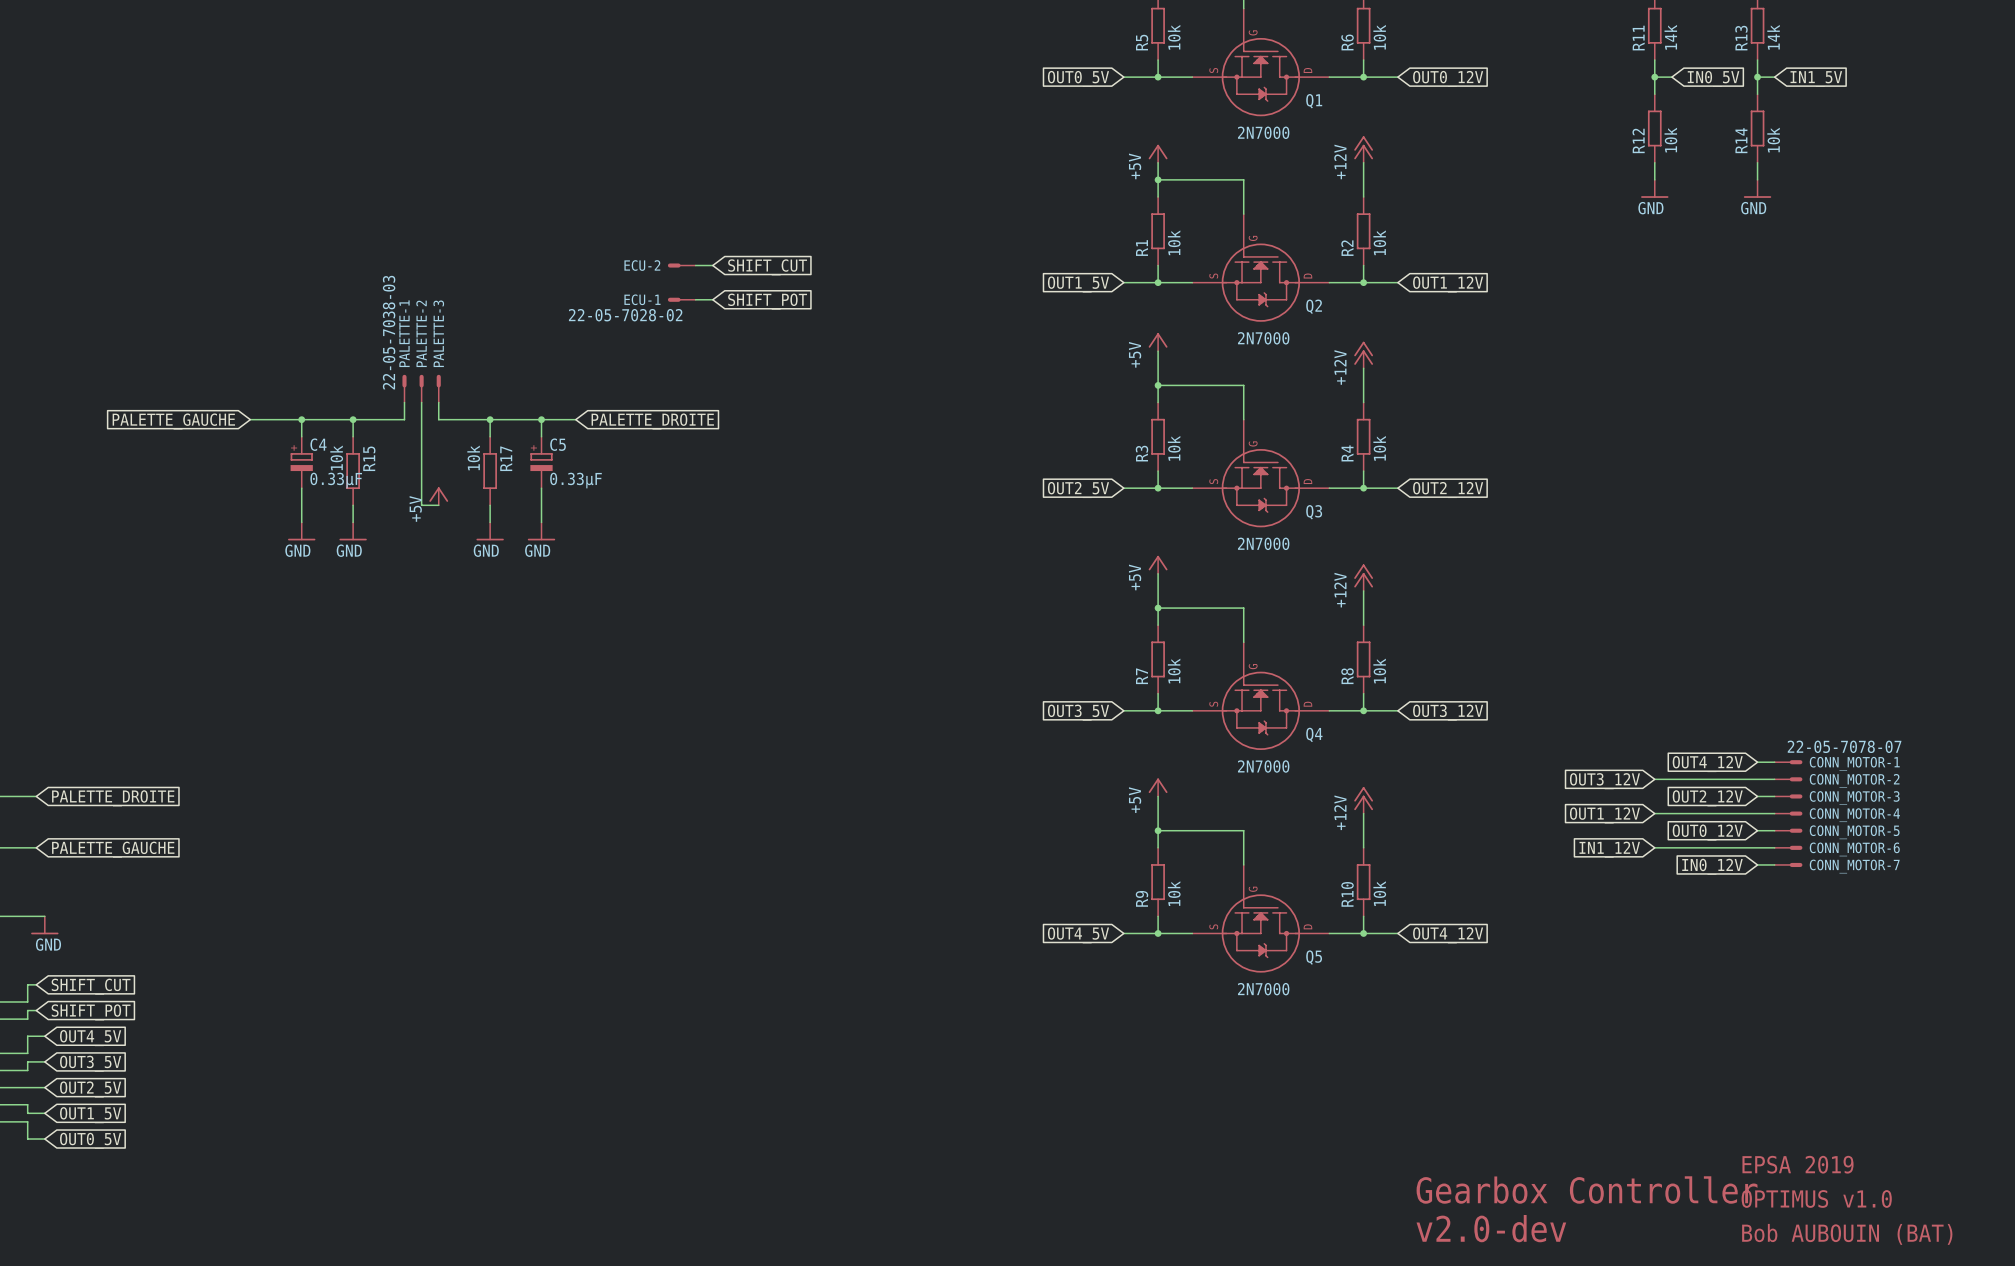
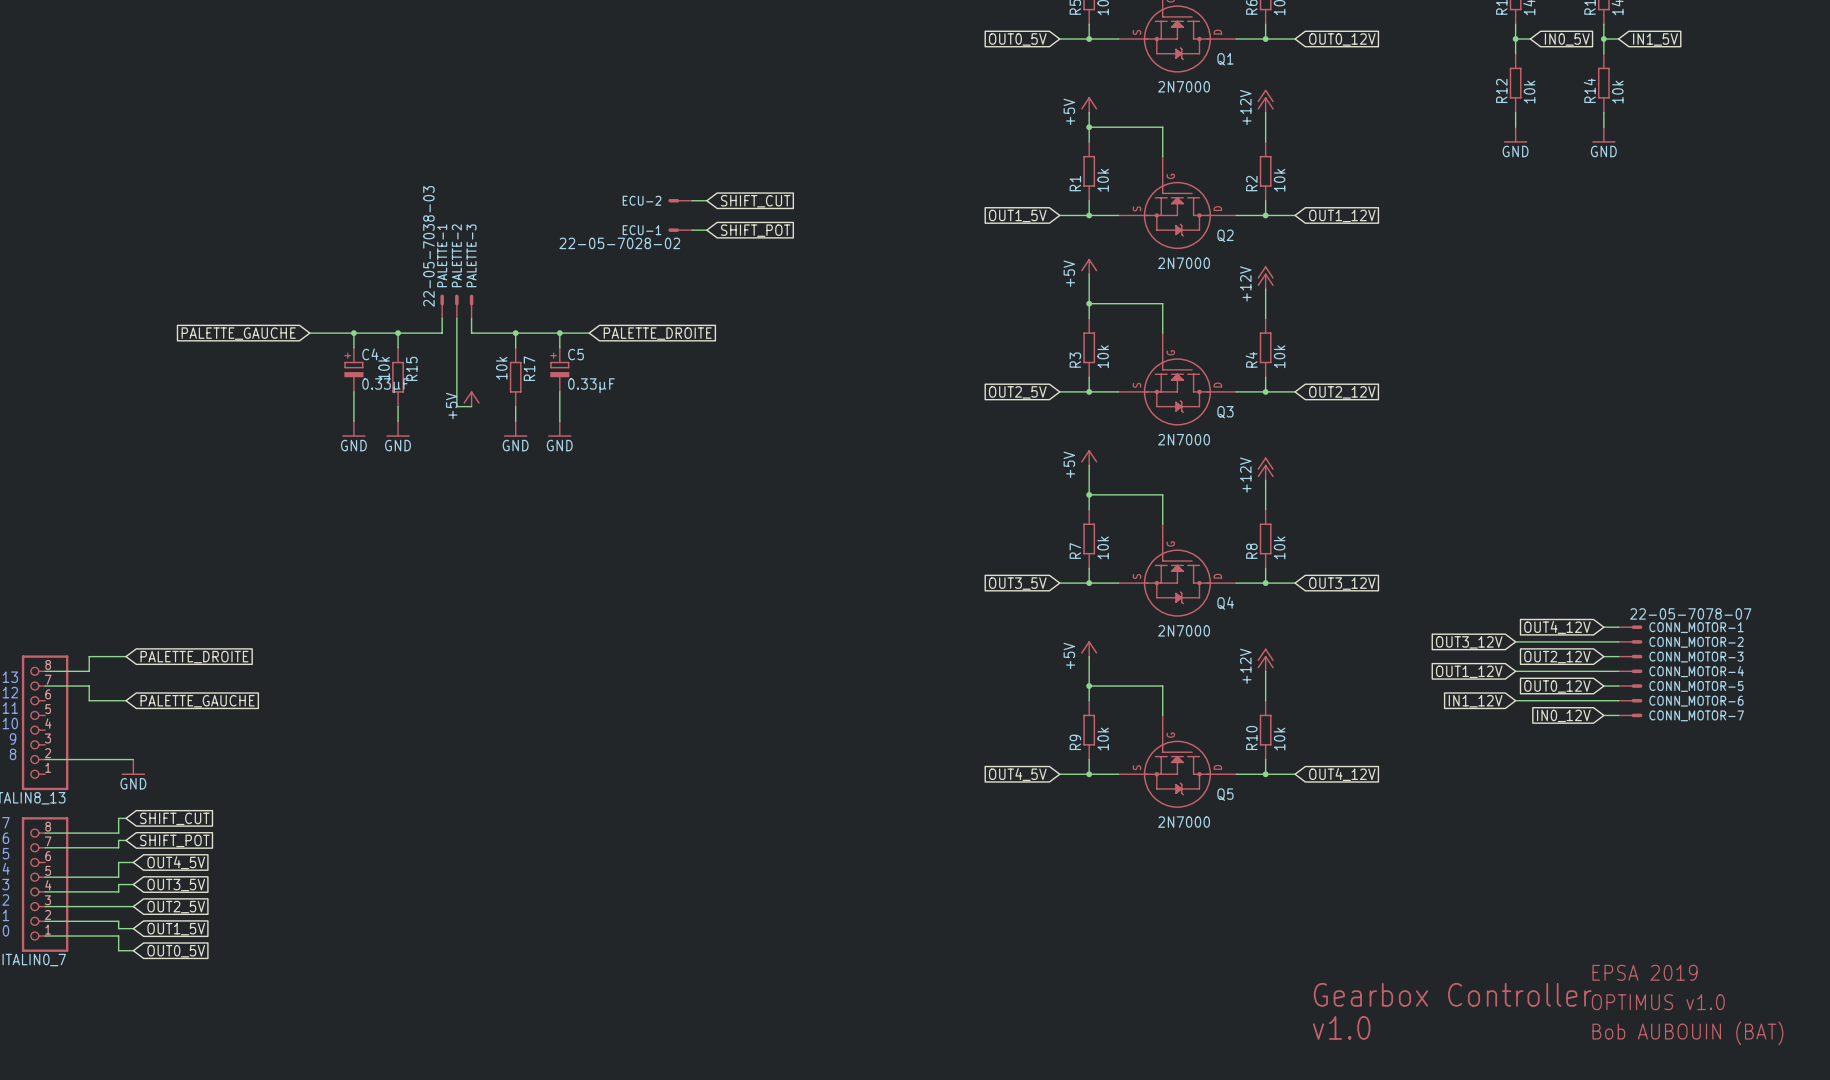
text: v2.0-dev (1491, 1228) -> v1.0 (1341, 1027)

